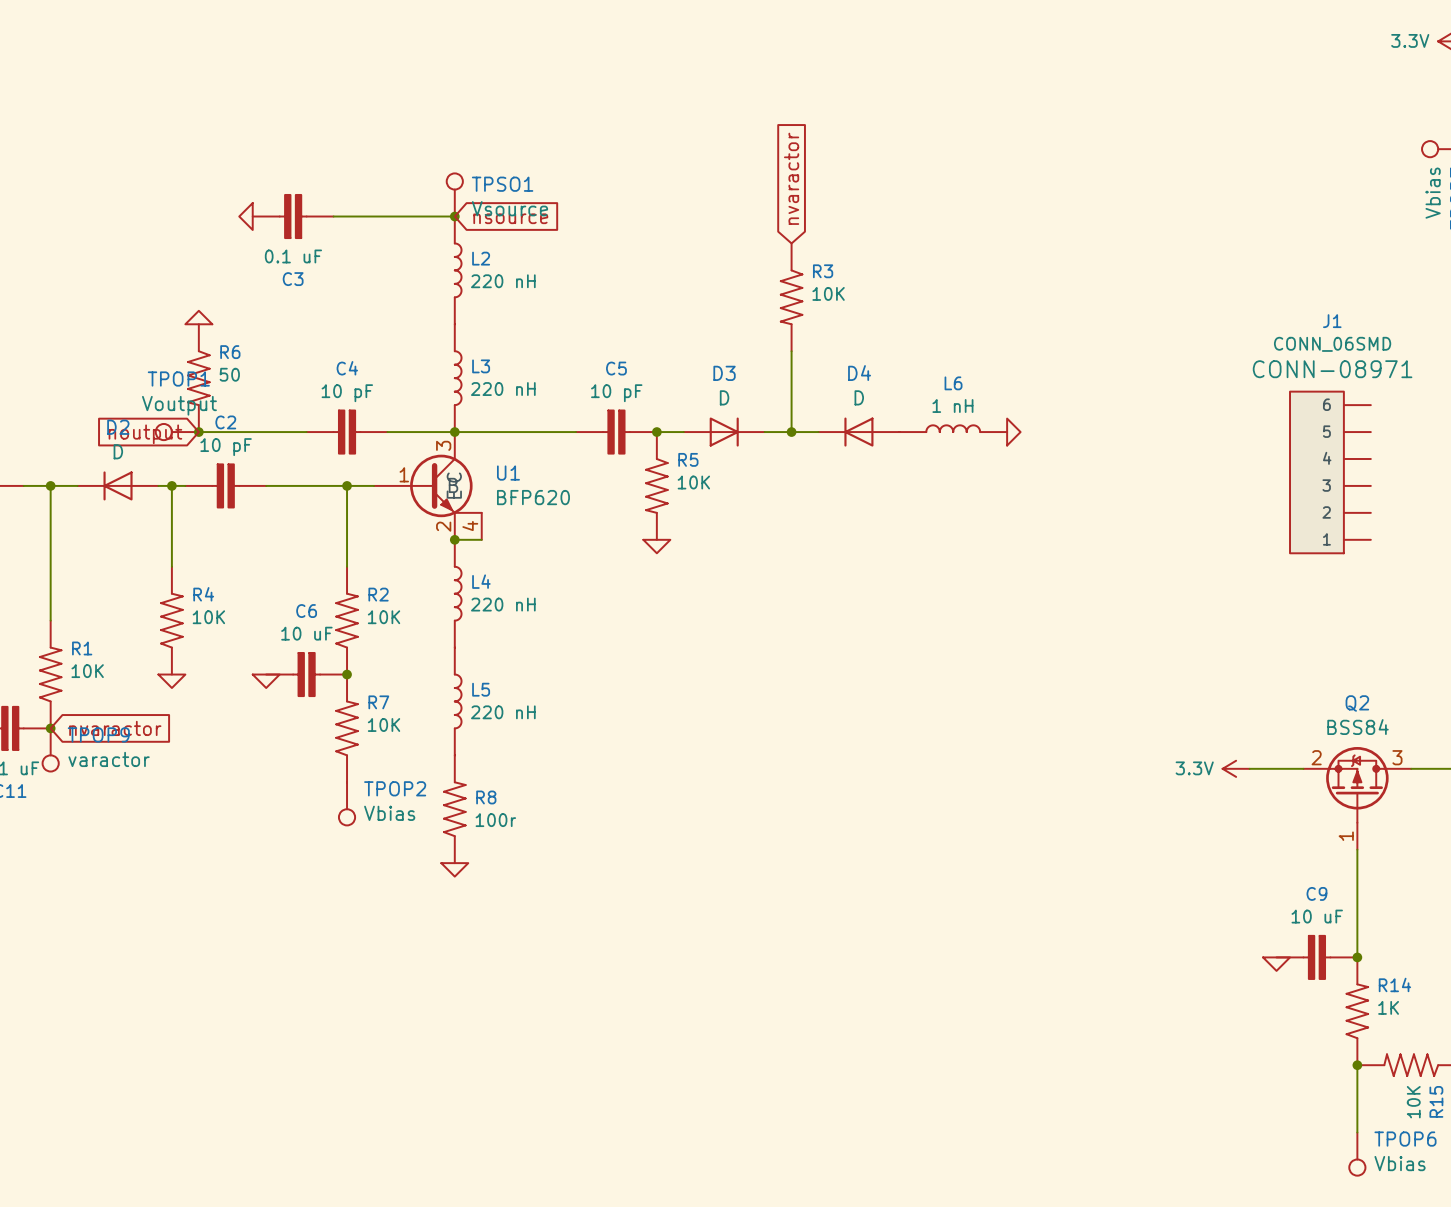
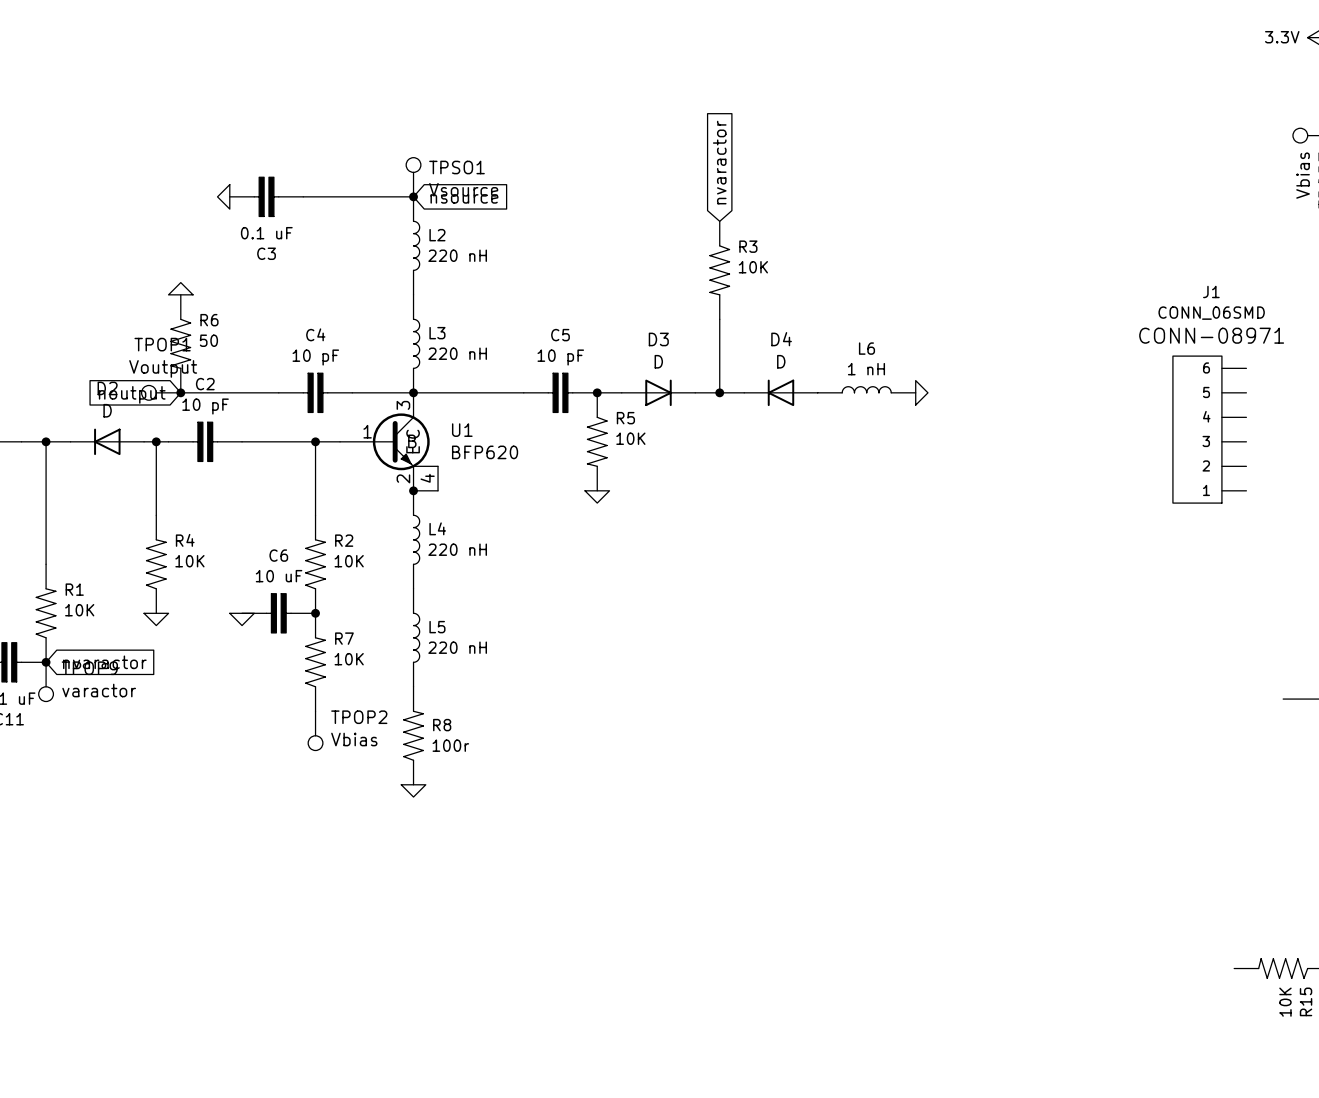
power symbol: 3.3V (1236, 768) -> none
wire: (1249, 768) (1303, 768) -> none
Q2: BSS84 (1357, 798) -> none
wire: (1357, 849) (1357, 957) -> none
C9: 10 uF (1316, 957) -> none
junction: (1357, 957) -> none
power symbol: (1276, 964) -> none
R14: 1K (1357, 1011) -> none
wire: (1357, 1065) (1357, 1132) -> none
junction: (1357, 1065) -> none
TPOP6: Vbias (1357, 1154) -> none

